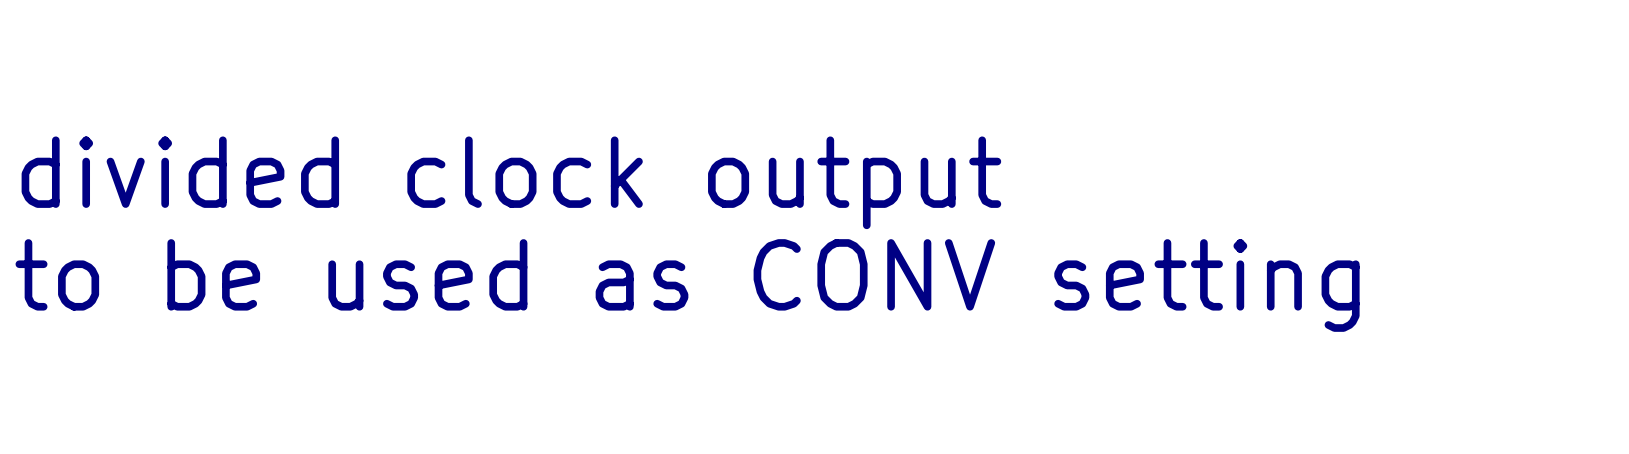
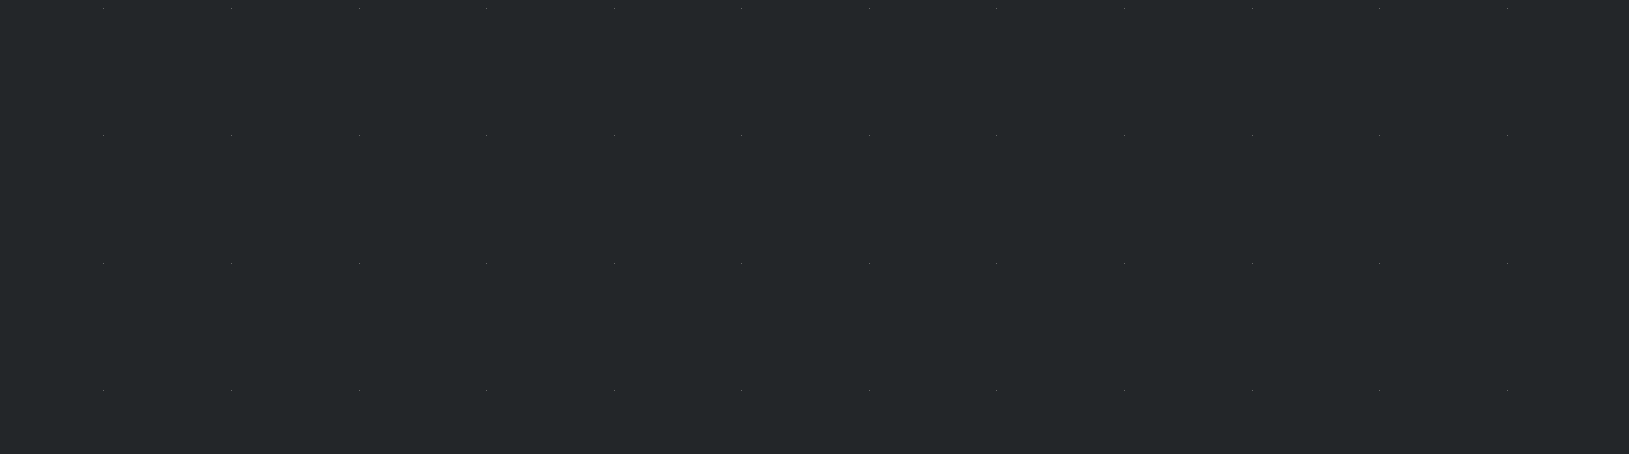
text: divided clock output (511, 182) -> none
text: to be used as CONV setting (687, 285) -> none

